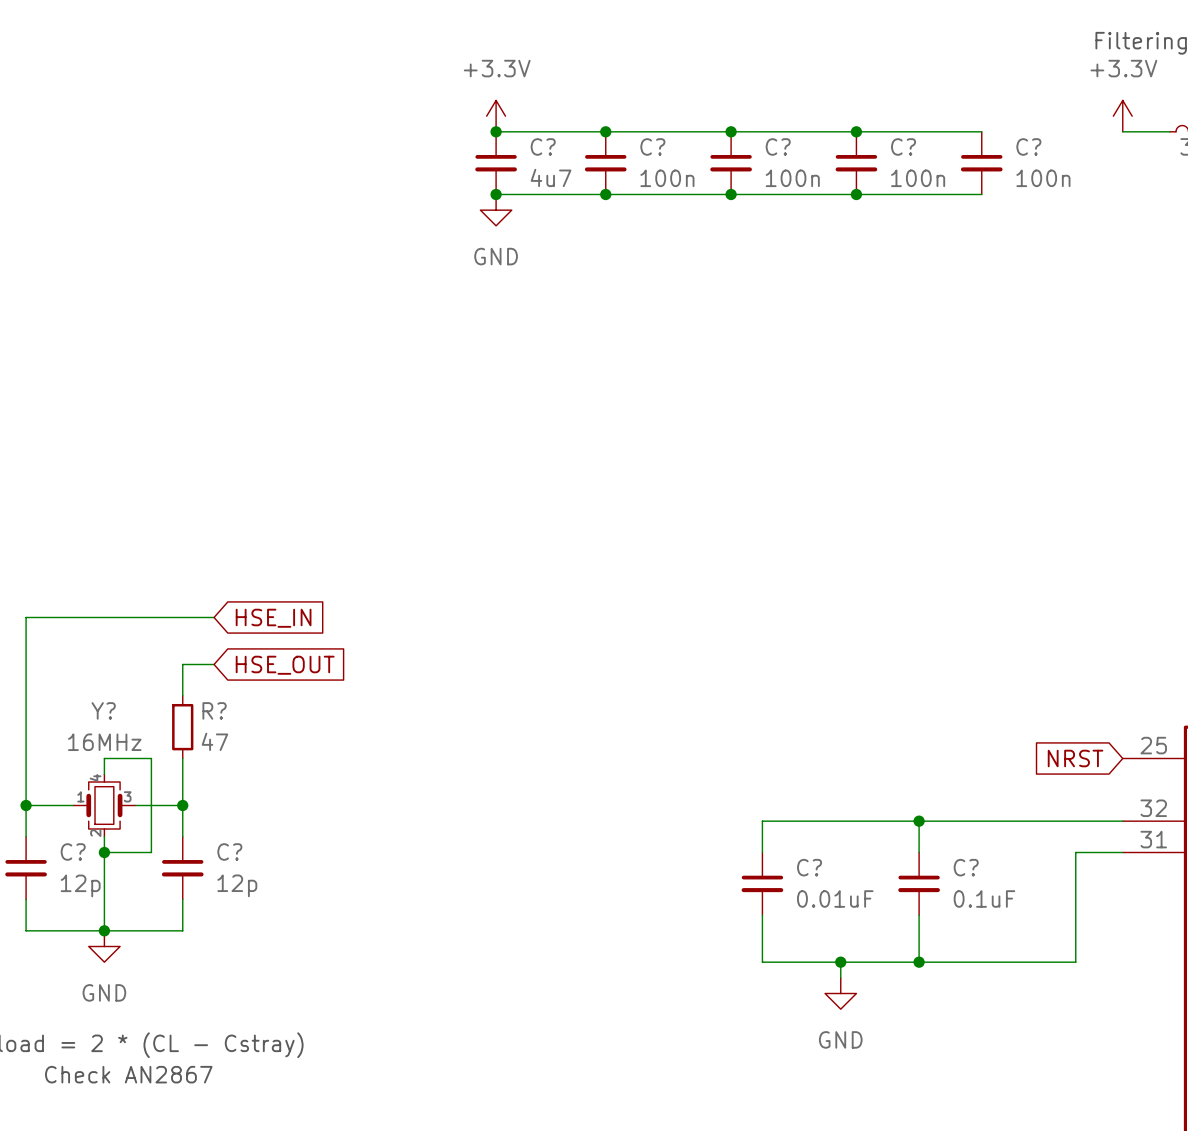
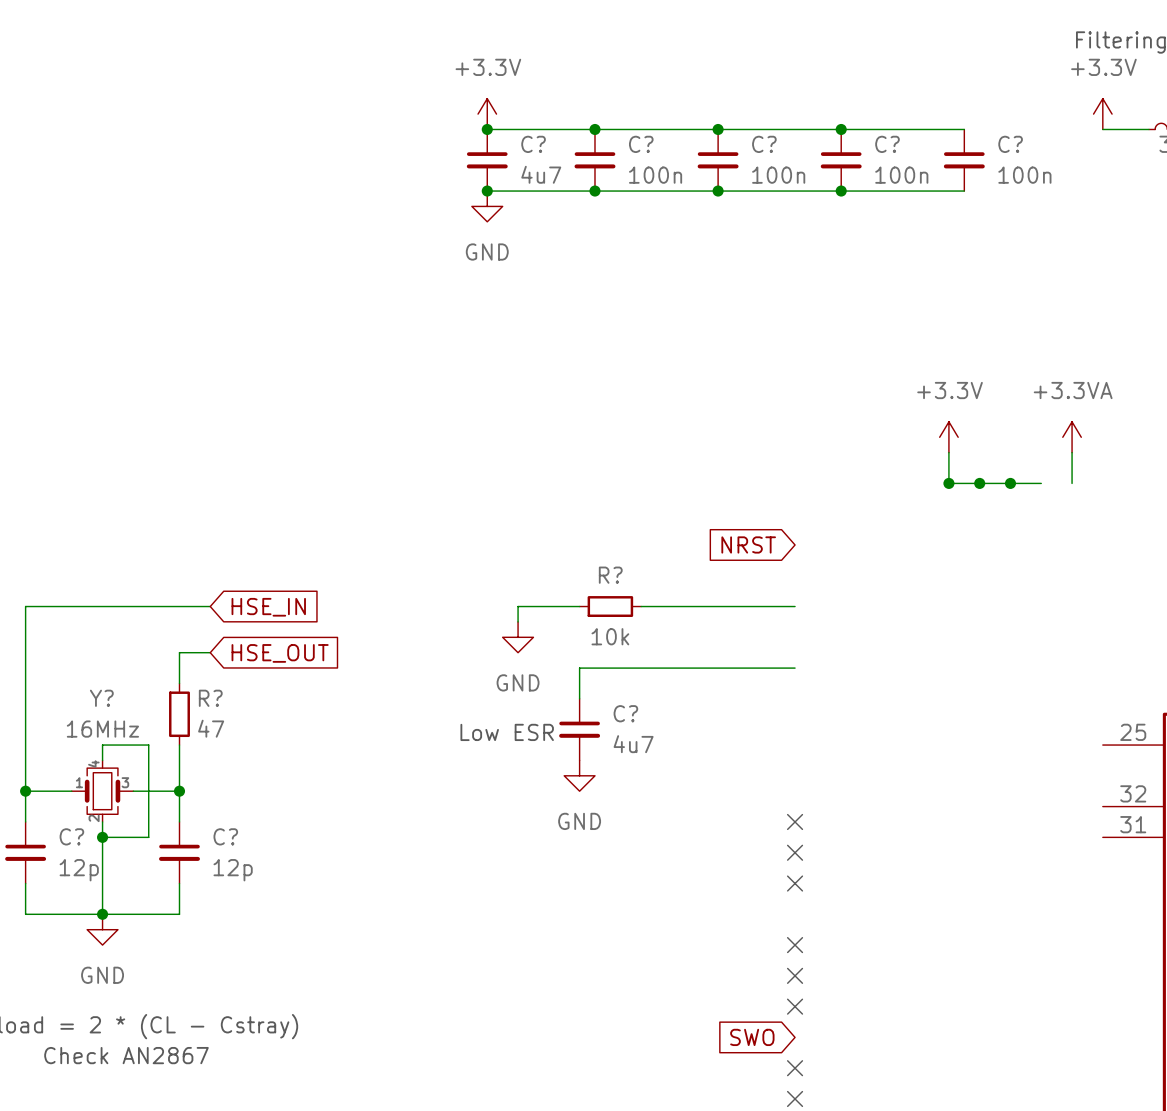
power symbol: none -> +3.3V (948, 437)
power symbol: none -> +3.3VA (1072, 437)
wire: none -> (948, 452) (948, 483) (1041, 483)
wire: none -> (1072, 452) (1072, 483)
junction: none -> (948, 483)
junction: none -> (979, 483)
junction: none -> (1010, 483)
global label: none -> NRST (748, 544)
wire: none -> (579, 606) (518, 606) (518, 621)
R?: none -> 10k (610, 606)
wire: none -> (641, 606) (795, 606)
power symbol: none -> GND (518, 637)
wire: none -> (795, 668) (579, 668) (579, 698)
C?: none -> 4u7 (579, 729)
text: none -> Low ESR (507, 732)
global label: NRST (1075, 758) -> none
power symbol: none -> GND (579, 775)
wire: (919, 821) (919, 852) -> none
junction: (919, 821) -> none
wire: (1122, 821) (762, 821) (762, 852) -> none
no-connect mark: none -> (795, 821)
wire: (1122, 852) (1075, 852) (1075, 962) (762, 962) (762, 915) -> none
no-connect mark: none -> (795, 852)
C?: 0.01uF (762, 883) -> none
C?: 0.1uF (919, 883) -> none
no-connect mark: none -> (795, 883)
wire: (919, 915) (919, 962) -> none
no-connect mark: none -> (795, 945)
wire: (840, 962) (840, 977) -> none
junction: (840, 962) -> none
junction: (919, 962) -> none
no-connect mark: none -> (795, 975)
power symbol: GND (840, 993) -> none
no-connect mark: none -> (795, 1006)
global label: none -> SWO (752, 1037)
no-connect mark: none -> (795, 1068)
no-connect mark: none -> (795, 1098)

